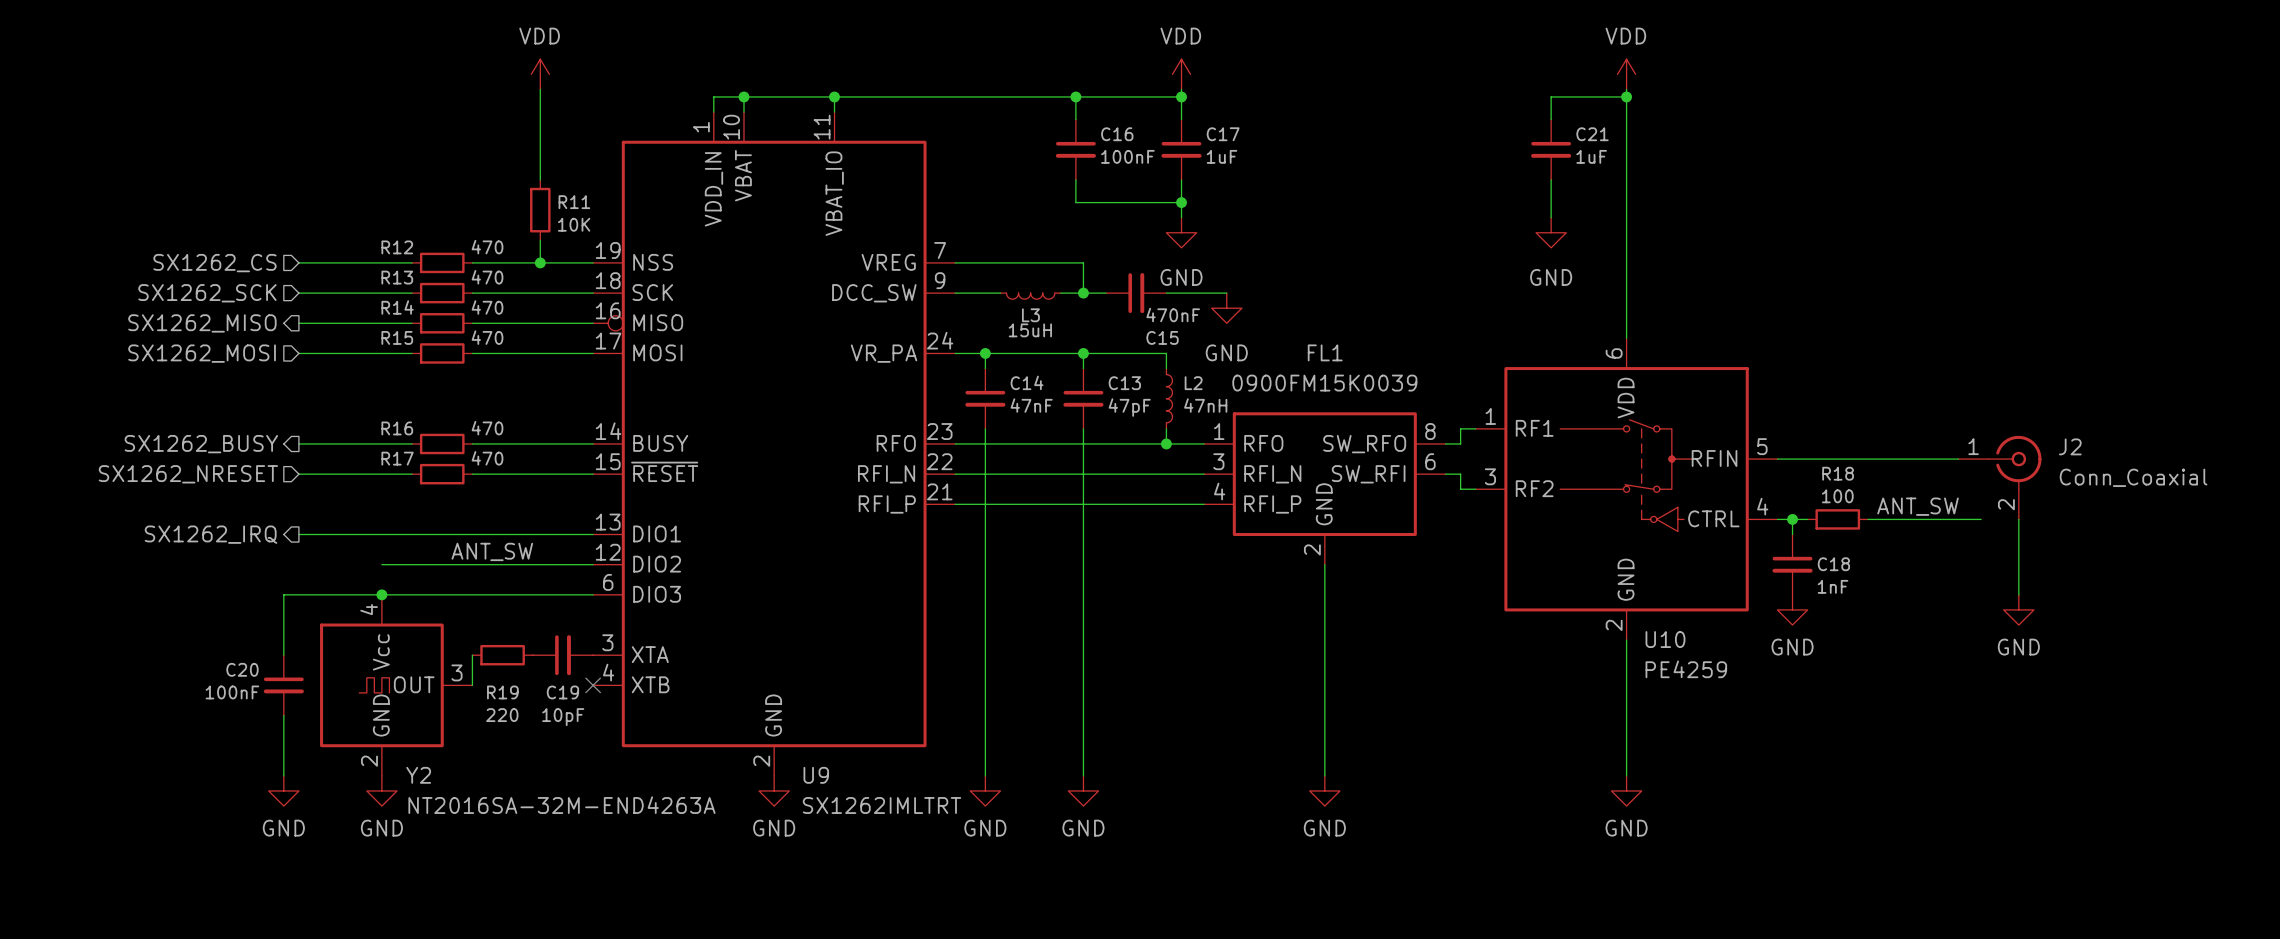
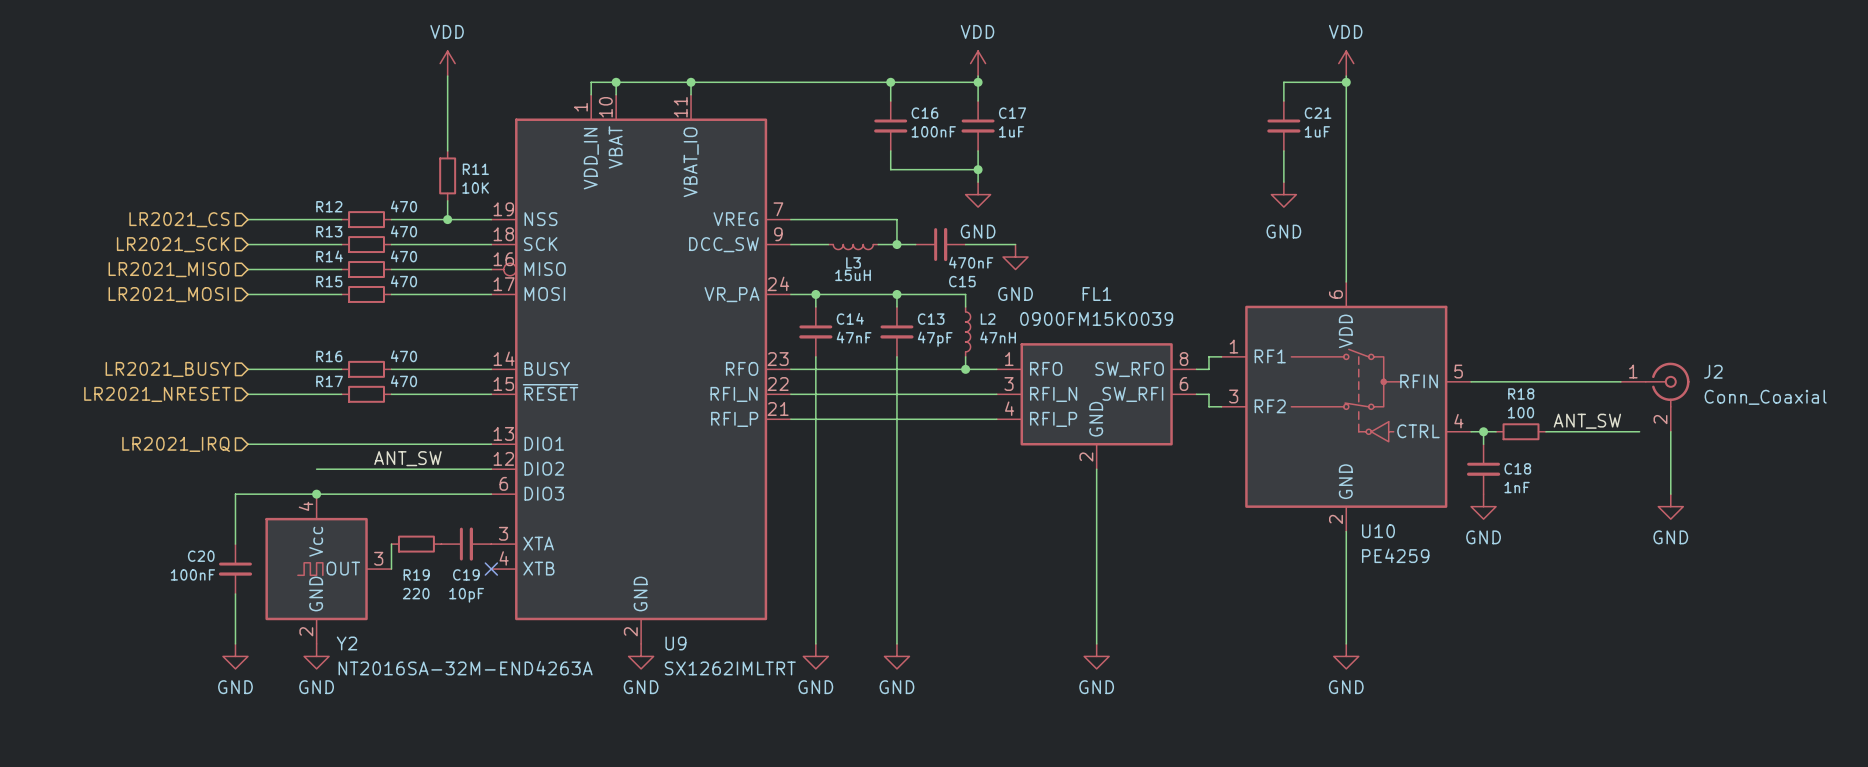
hierarchical label: SX1262_CS (214, 263) -> LR2021_CS (179, 219)
hierarchical label: SX1262_SCK (207, 293) -> LR2021_SCK (173, 244)
hierarchical label shape: output (202, 323) -> input (169, 269)
hierarchical label: SX1262_MISO (202, 323) -> LR2021_MISO (169, 269)
hierarchical label: SX1262_MOSI (202, 353) -> LR2021_MOSI (168, 294)
hierarchical label shape: output (201, 444) -> input (168, 369)
hierarchical label: SX1262_BUSY (201, 444) -> LR2021_BUSY (168, 369)
hierarchical label: SX1262_NRESET (188, 474) -> LR2021_NRESET (157, 394)
hierarchical label shape: output (211, 534) -> input (176, 444)
hierarchical label: SX1262_IRQ (211, 534) -> LR2021_IRQ (176, 444)

